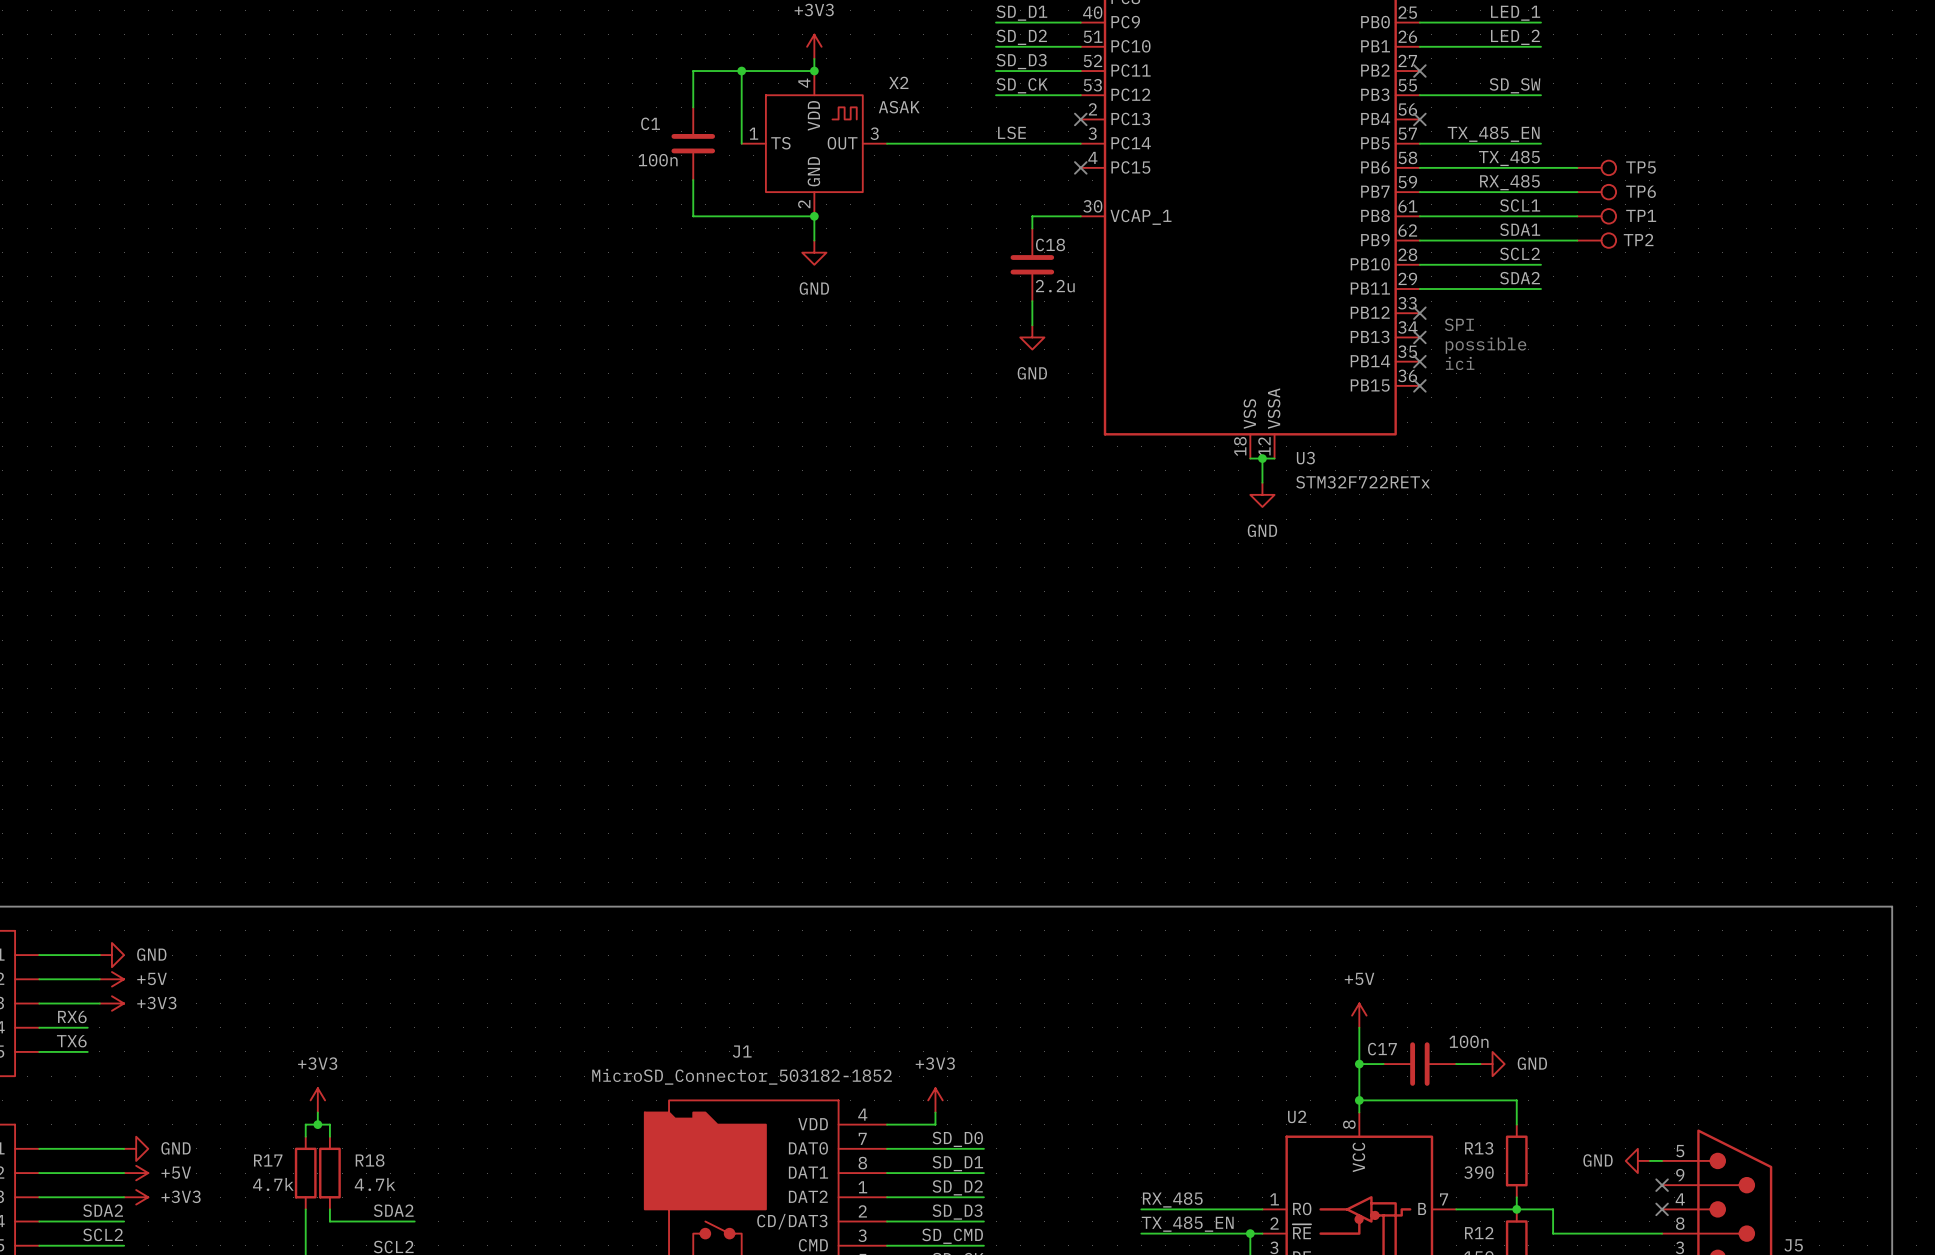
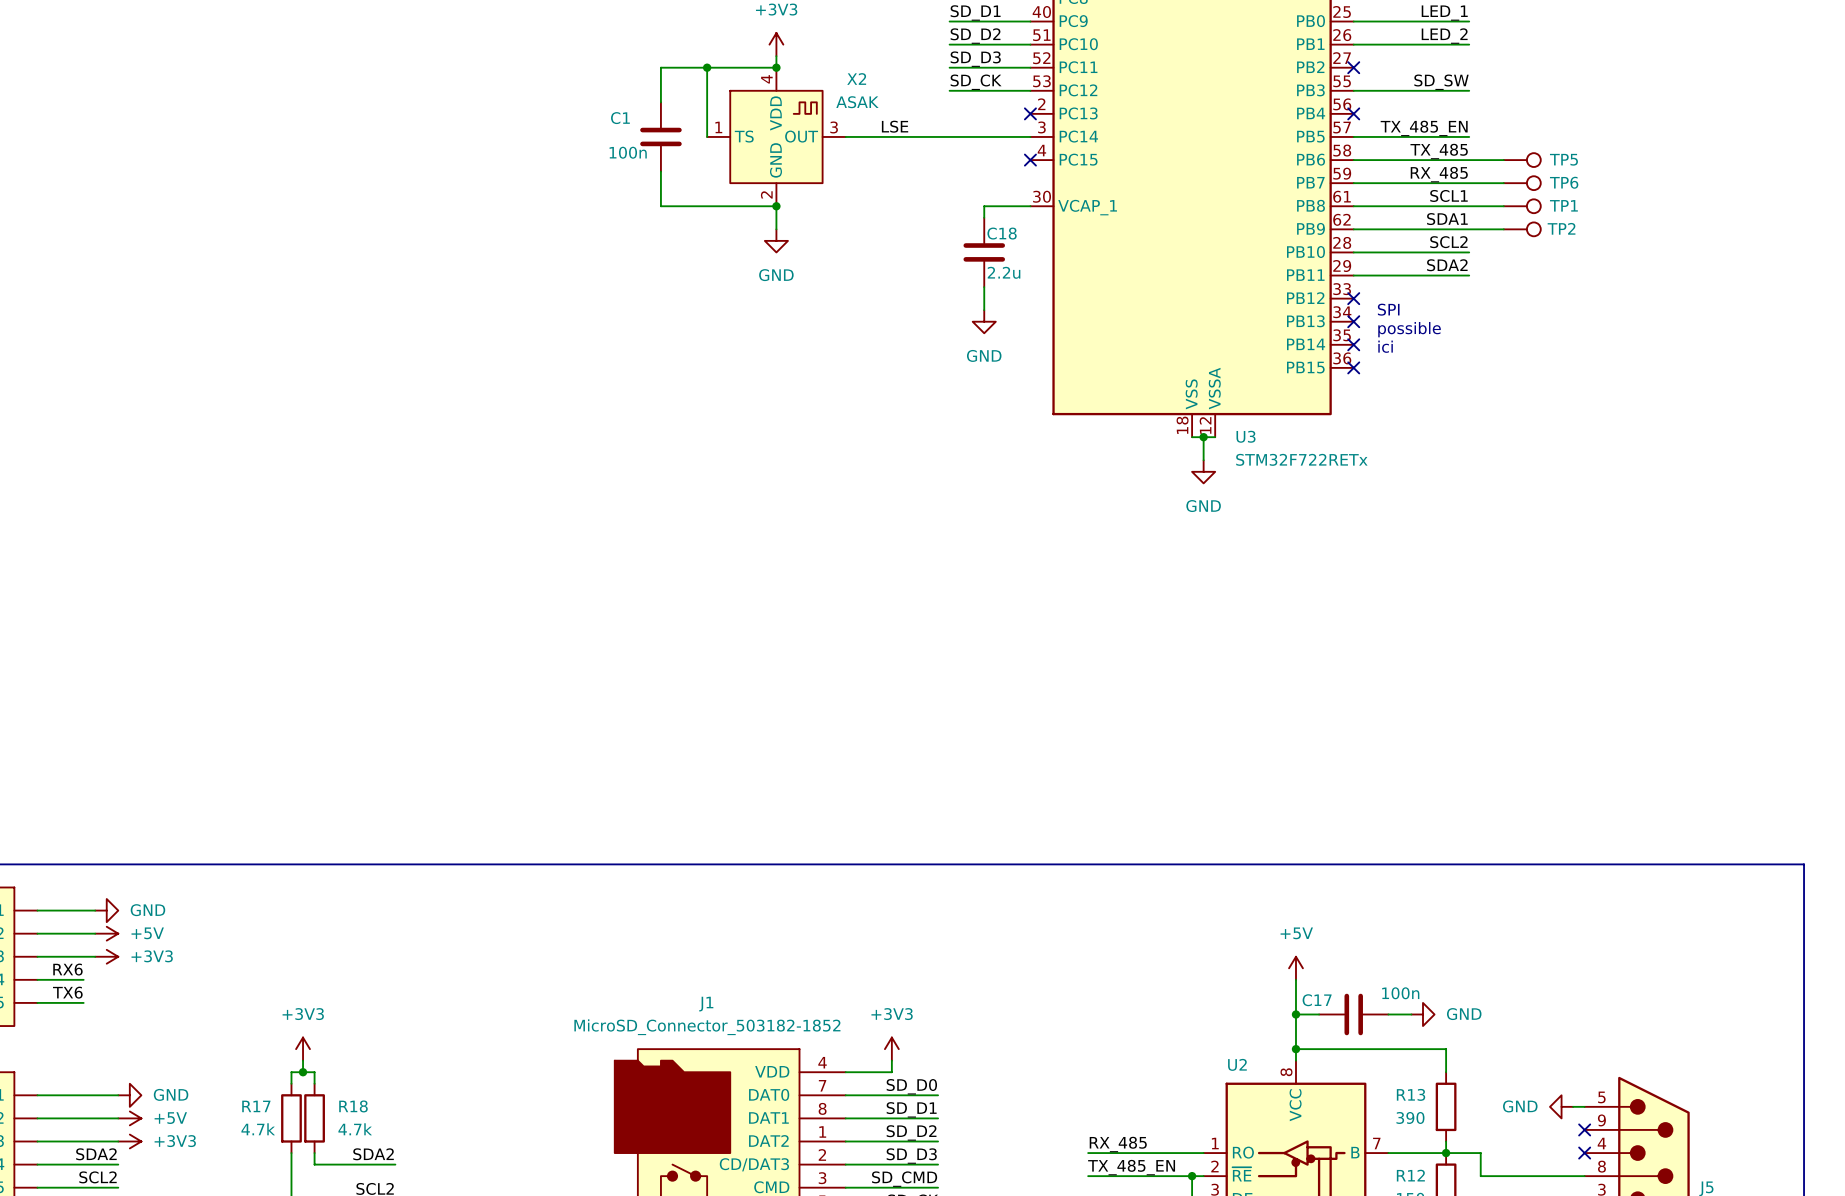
label position: LSE (1011, 132) -> LSE (895, 126)

